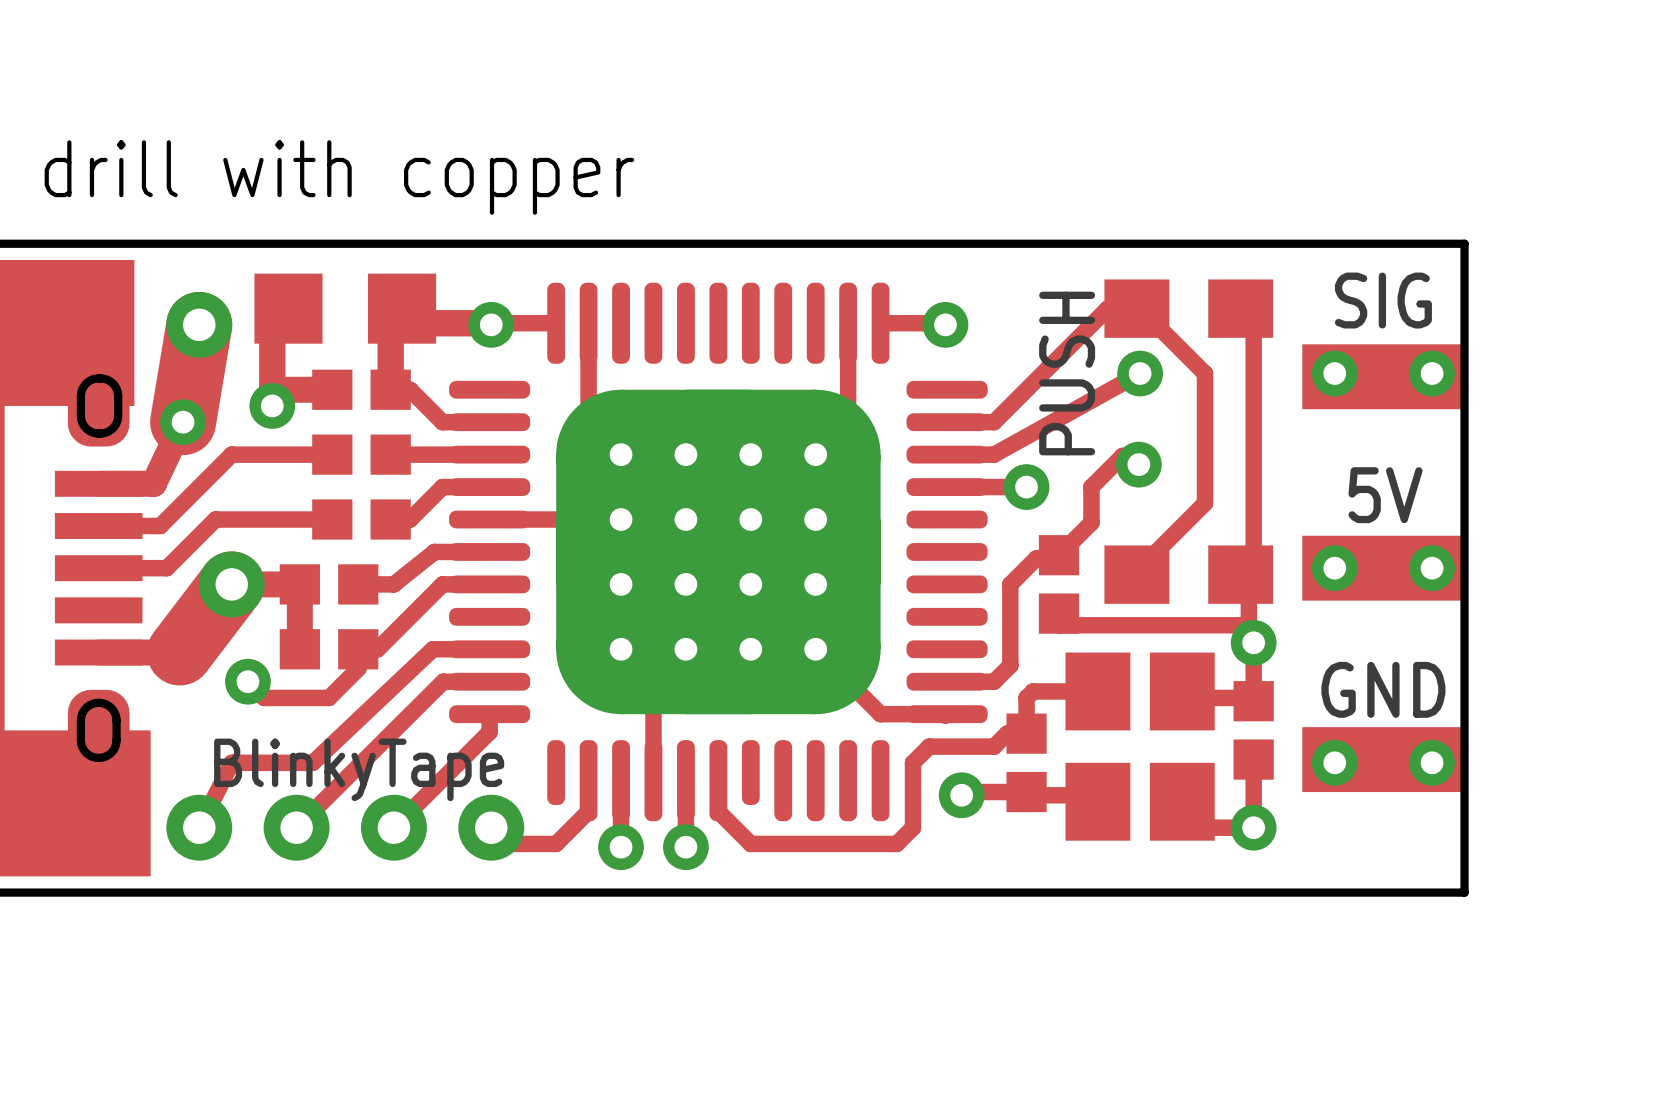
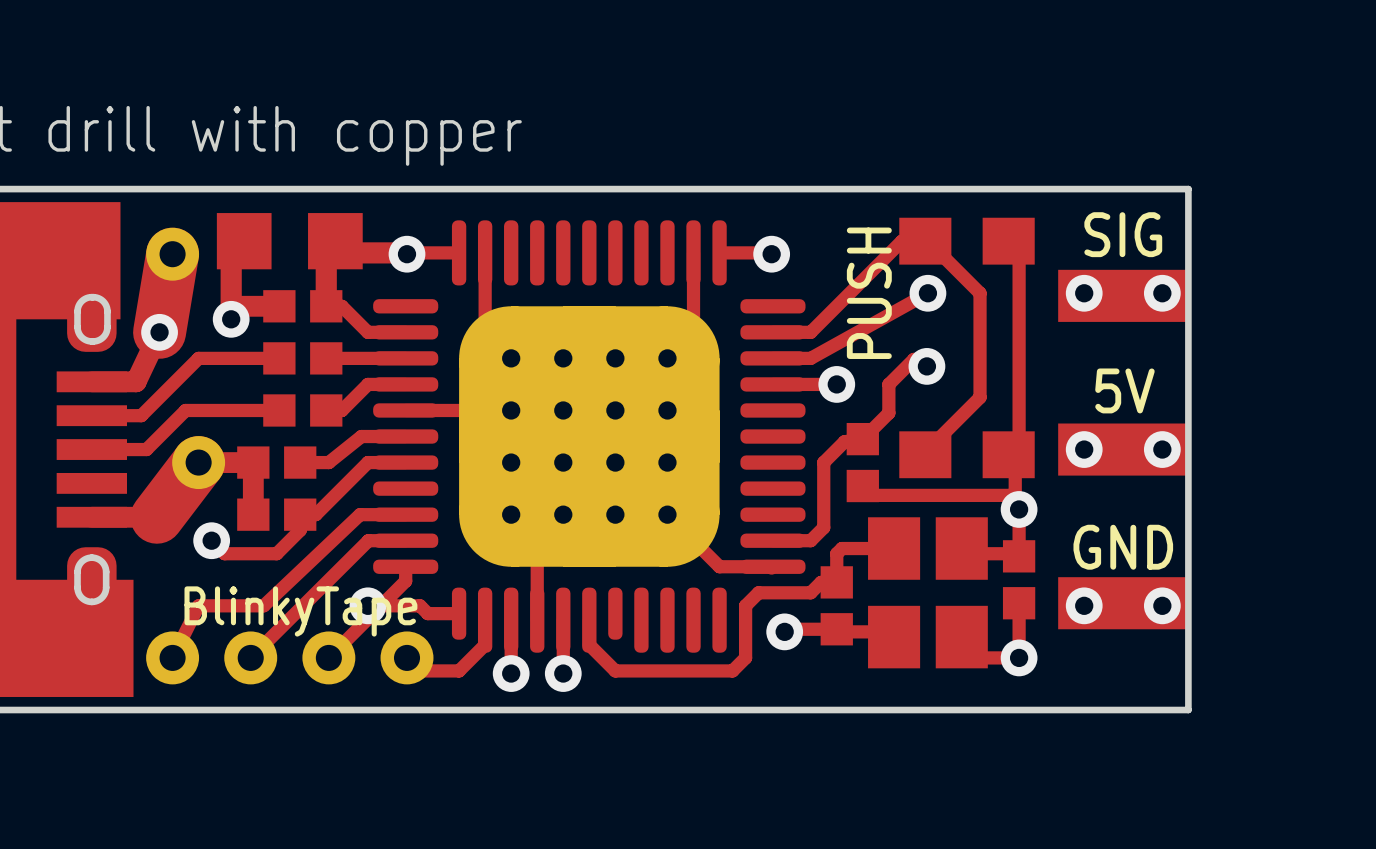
track: none -> (367, 605) (420, 605) (427, 613) (459, 613)
via: none -> (367, 605)

